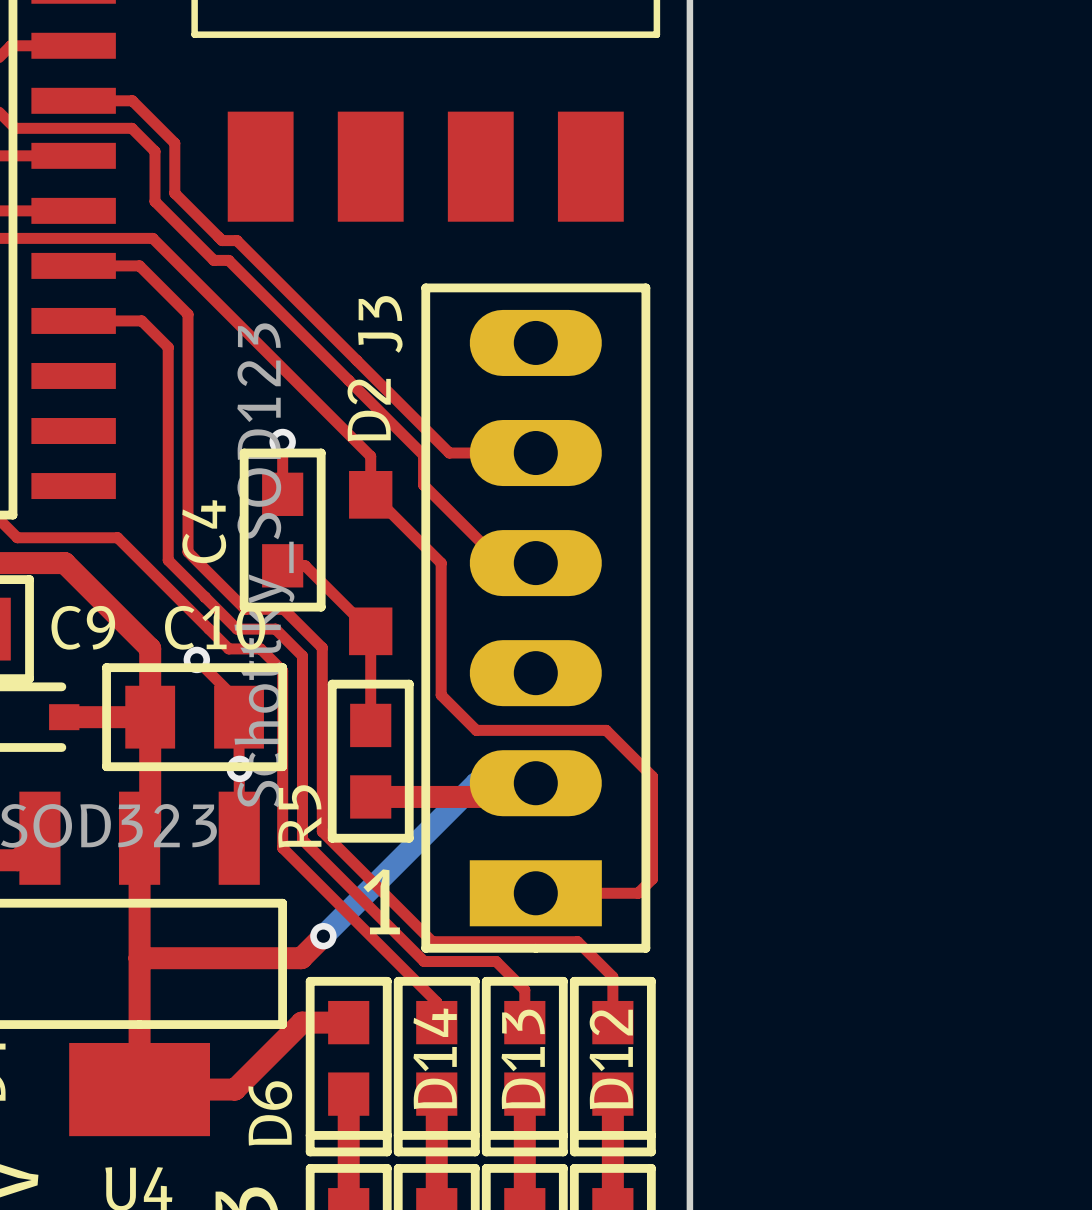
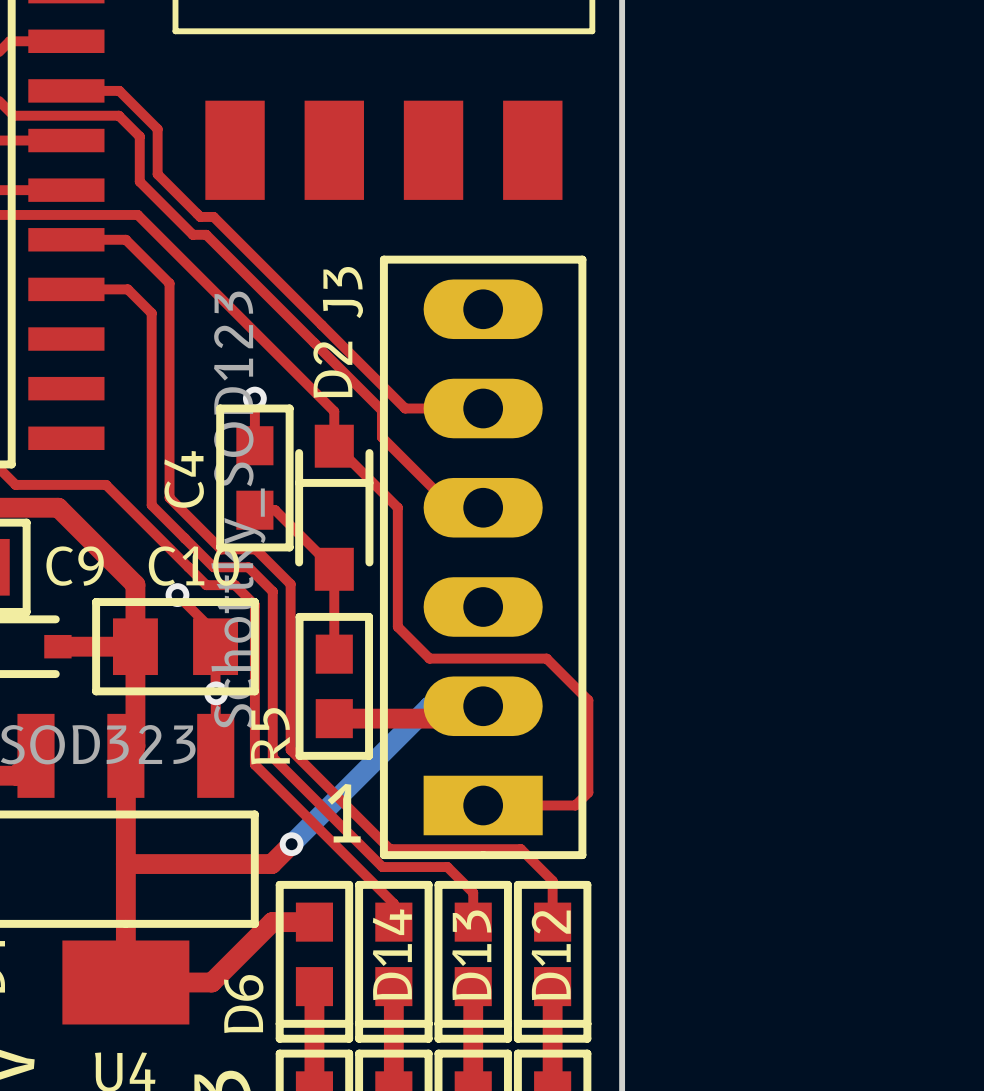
D2 footprint: [349, 471, 393, 656] -> [295, 424, 374, 591]

